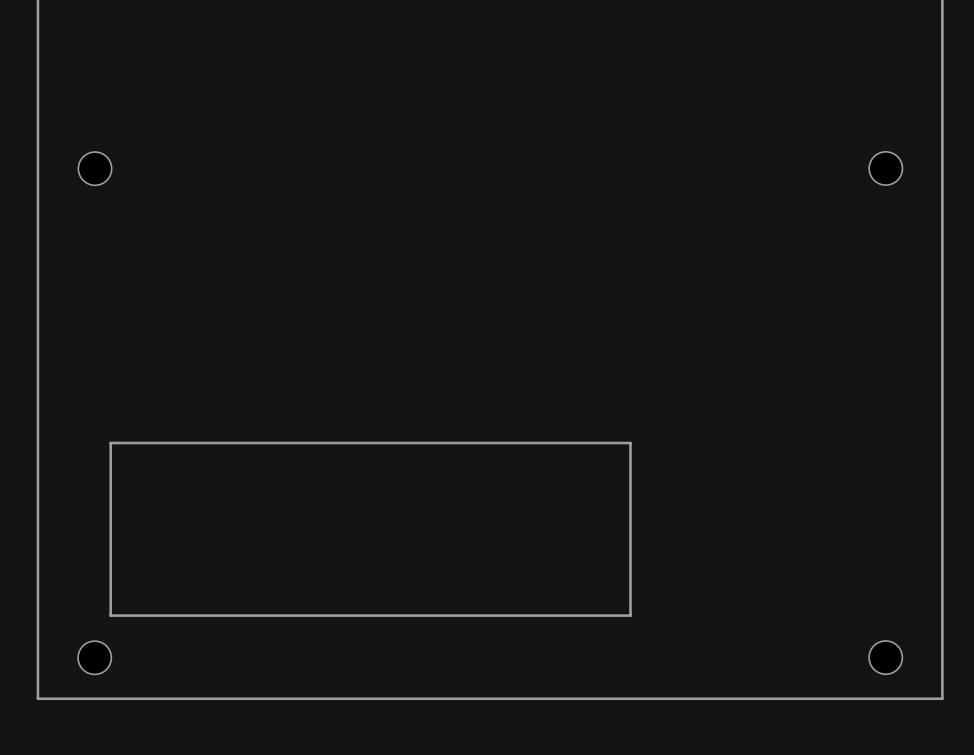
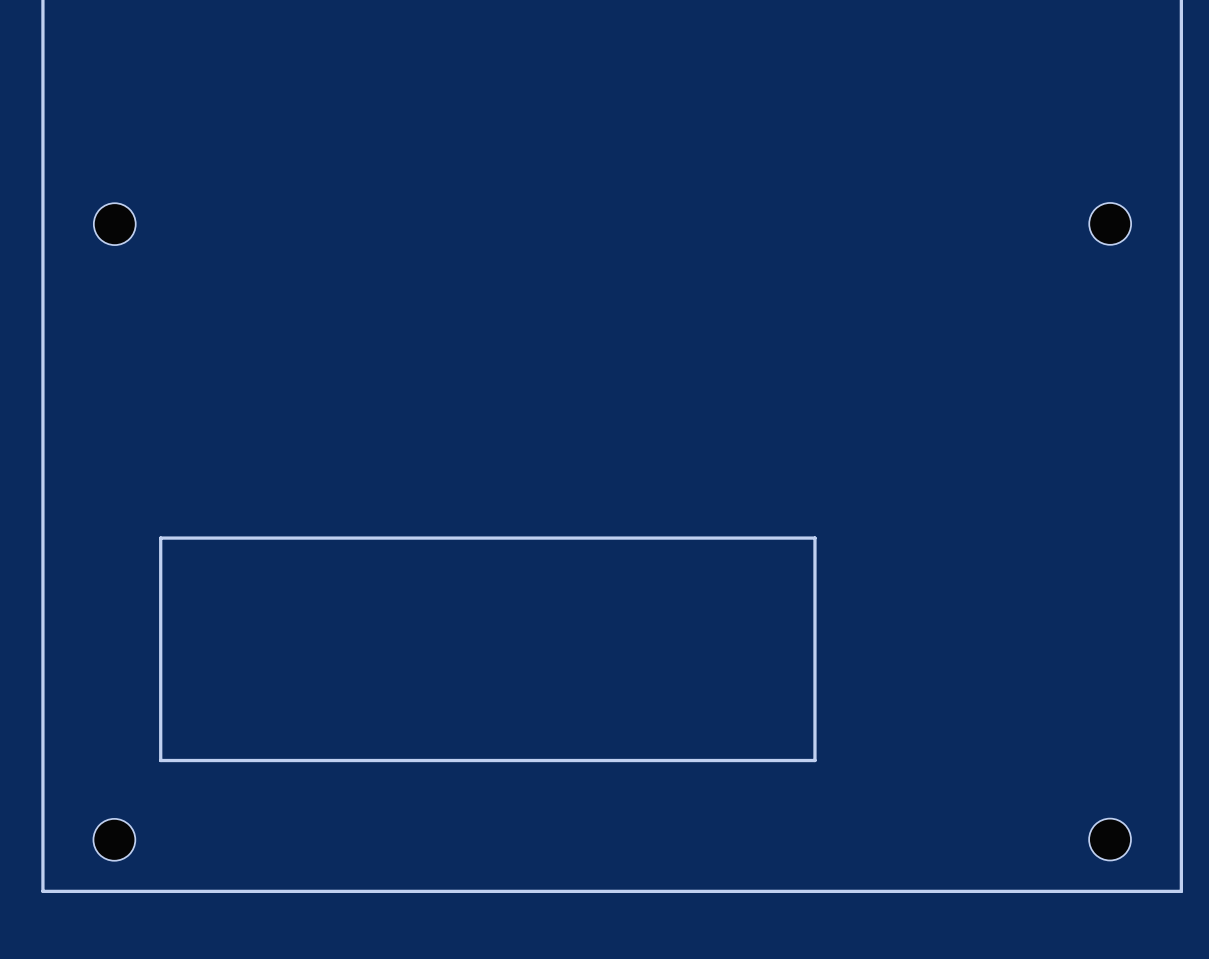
board edge: (630, 443) (110, 443) (110, 615) (630, 615) (630, 443) -> (814, 538) (814, 760) (160, 760) (160, 538) (814, 538)

